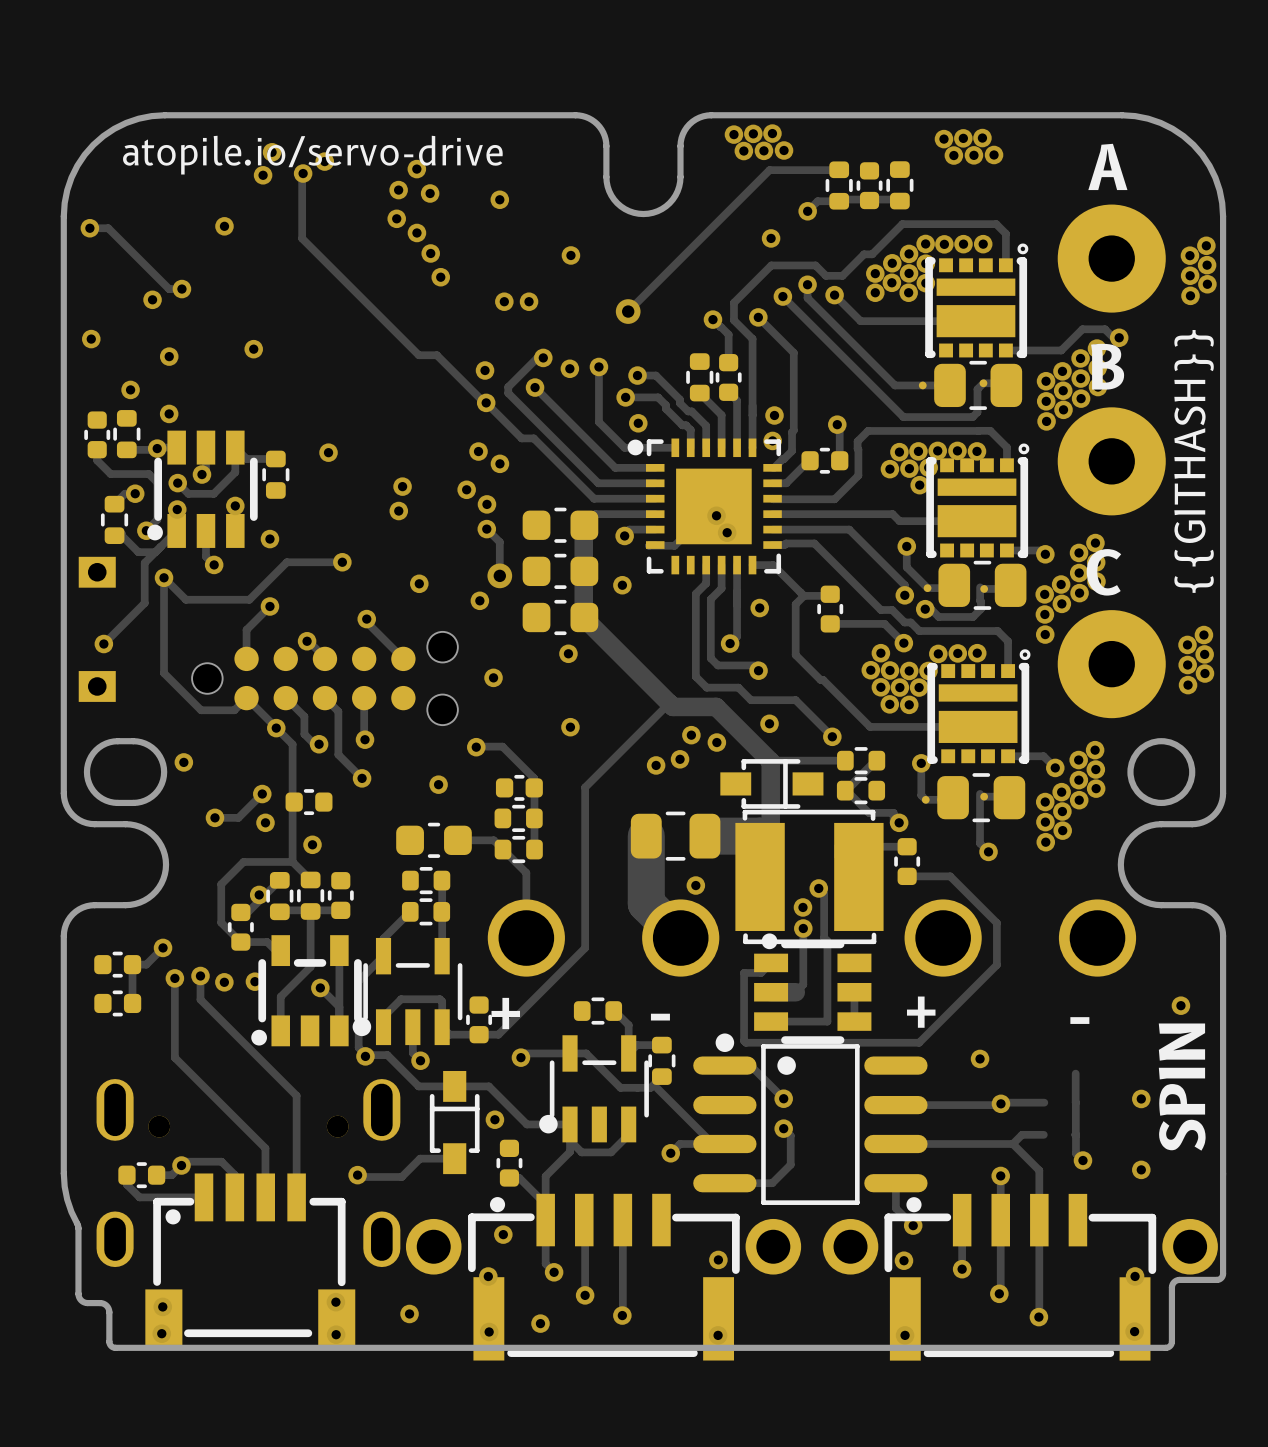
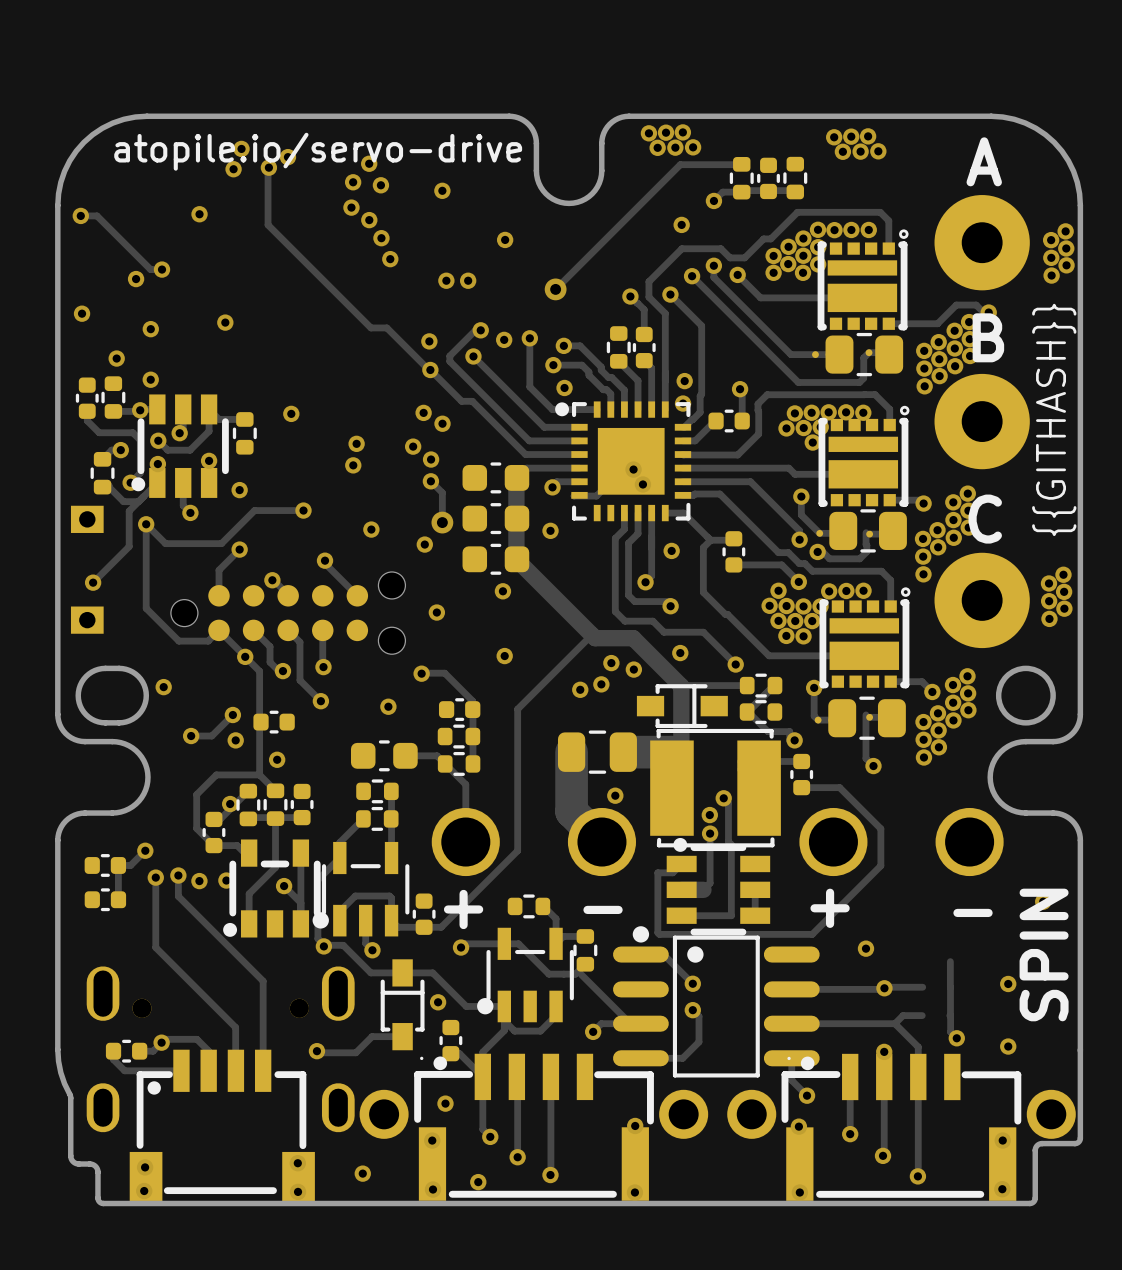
part footprint: [468, 1193, 740, 1361] -> [414, 1053, 654, 1201]
part footprint: [884, 1193, 1157, 1361] -> [781, 1053, 1022, 1201]

